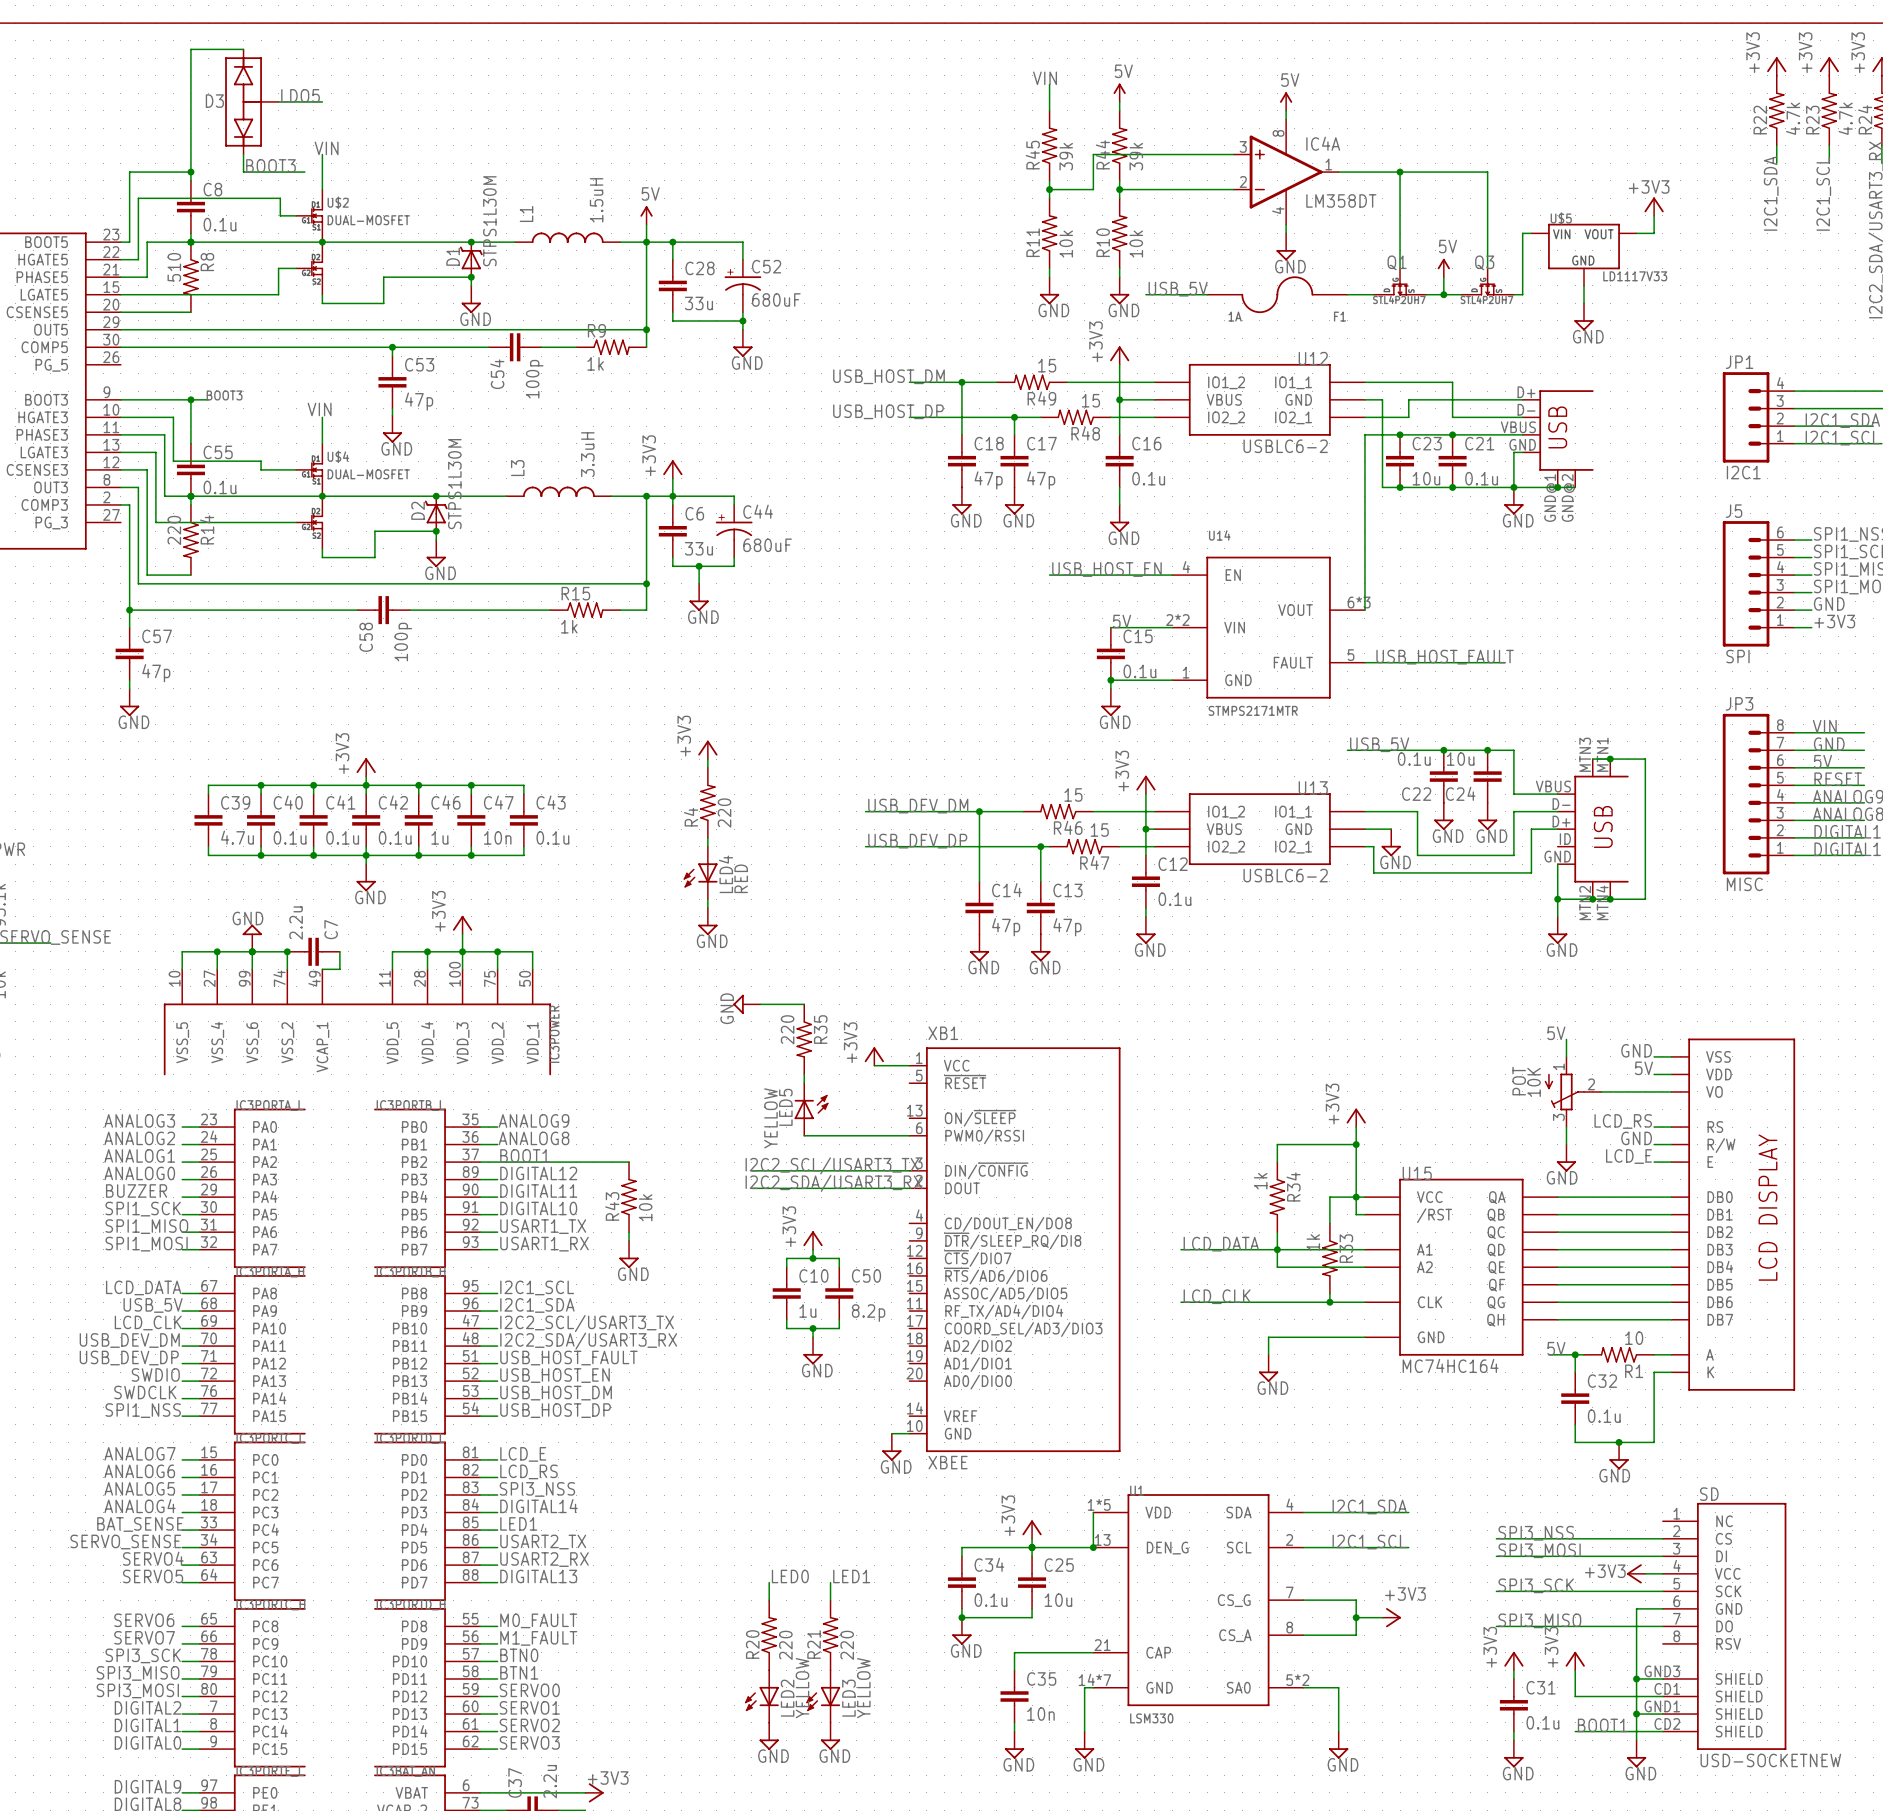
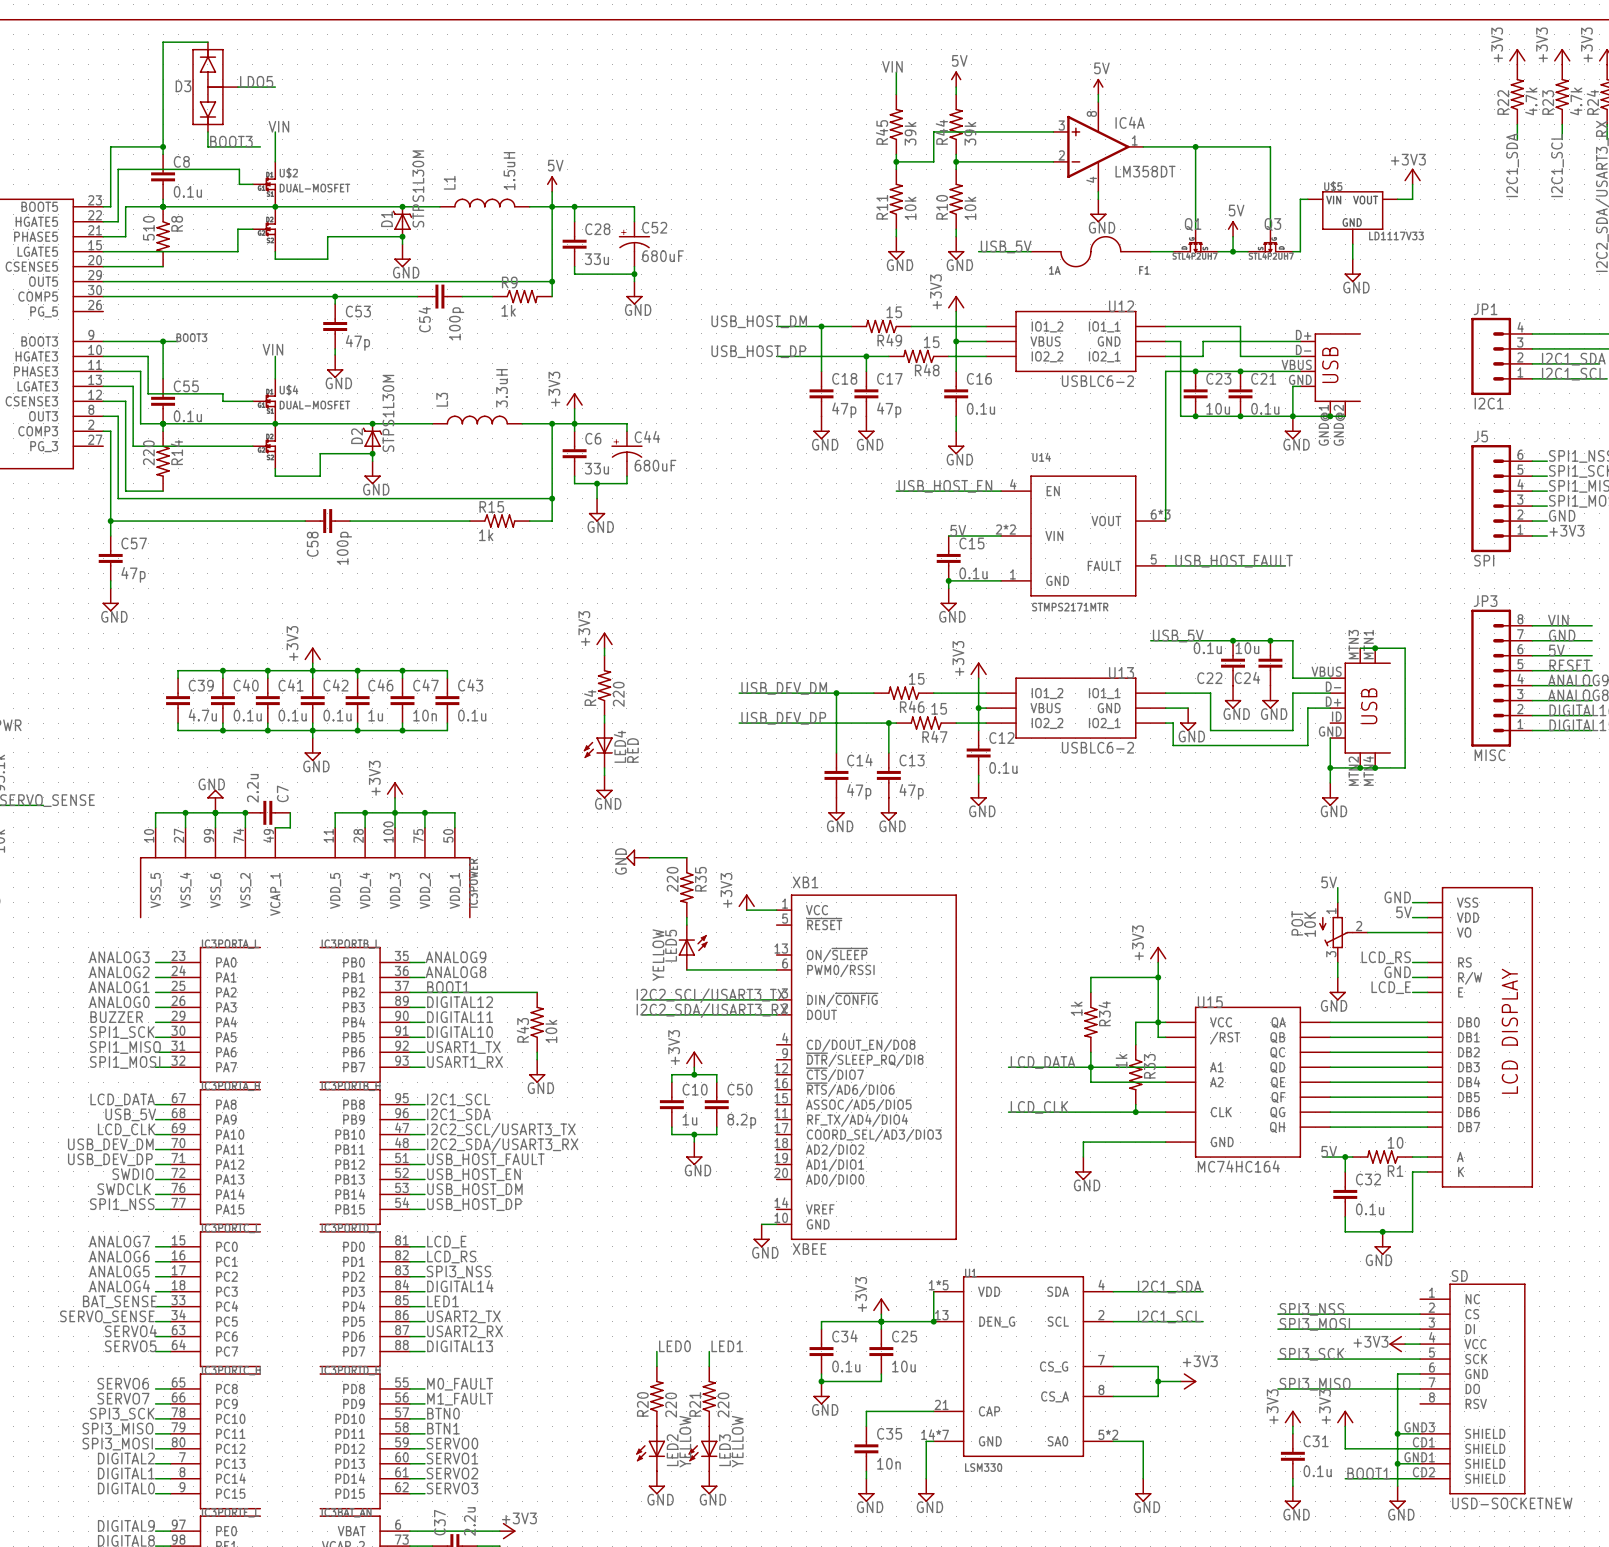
Q3 symbol: [1460, 267, 1515, 296] -> [1247, 228, 1294, 253]

